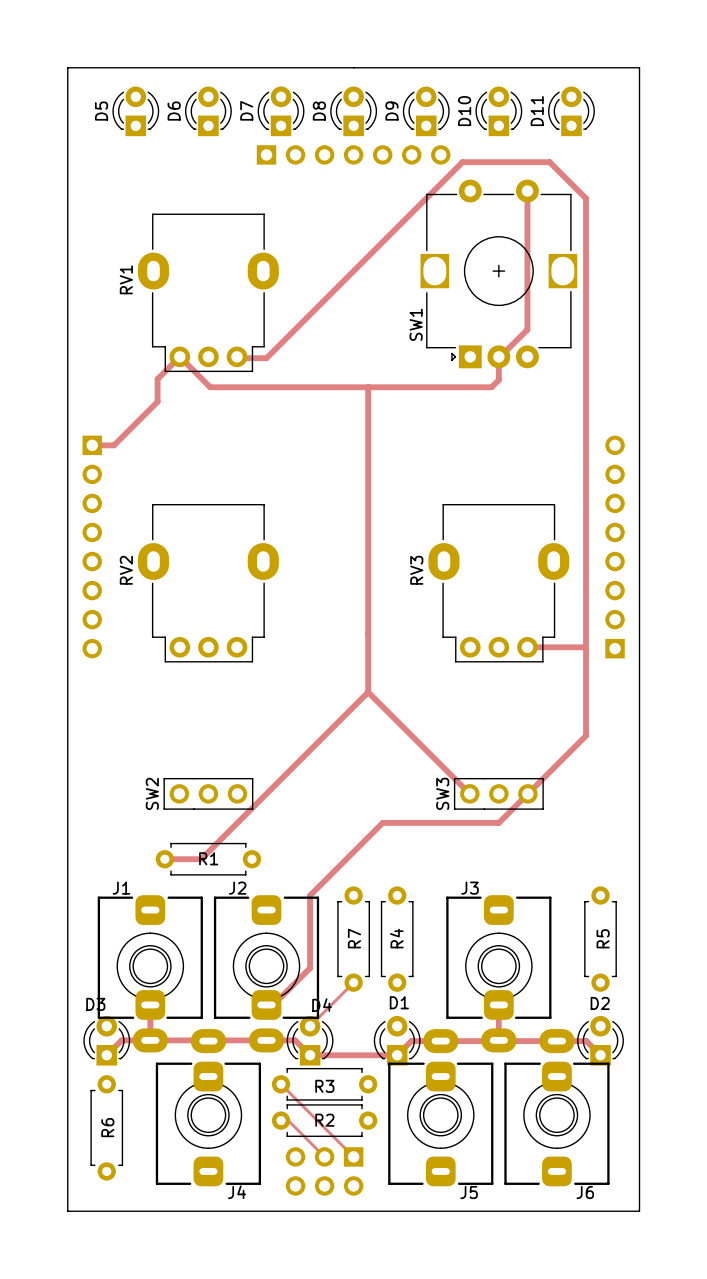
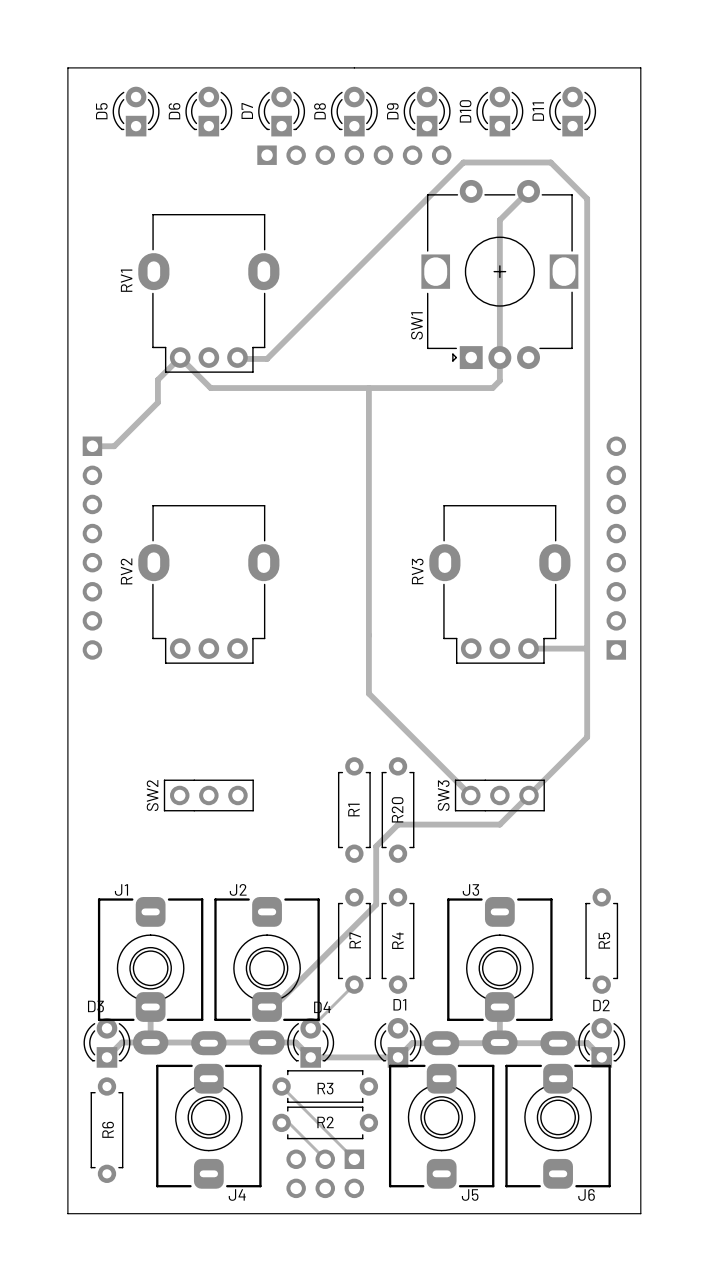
track: none -> (528, 191) (499, 220) (499, 357)
track: (527, 192) (527, 329) (498, 358) -> none
track: (368, 692) (201, 859) (164, 859) -> none
R20: none -> (398, 810)
track: (397, 822) (382, 822) (310, 895) (310, 968) -> (398, 824) (376, 846) (376, 904) (310, 970)
R1 rotation: 0° (208, 859) -> 90° clockwise (354, 810)
R1 position: (208, 859) -> (354, 810)

